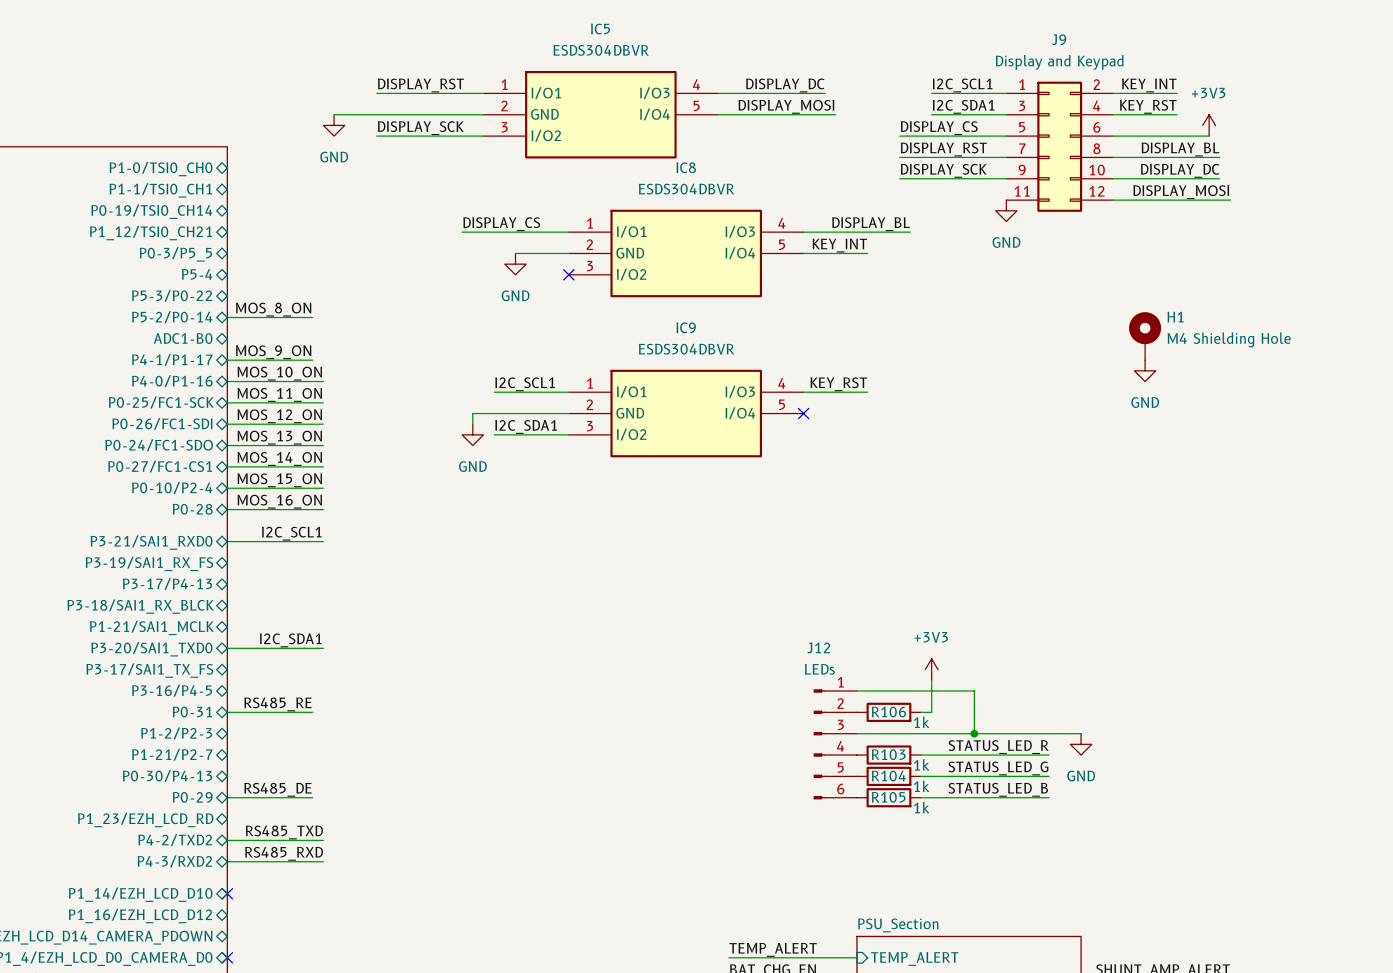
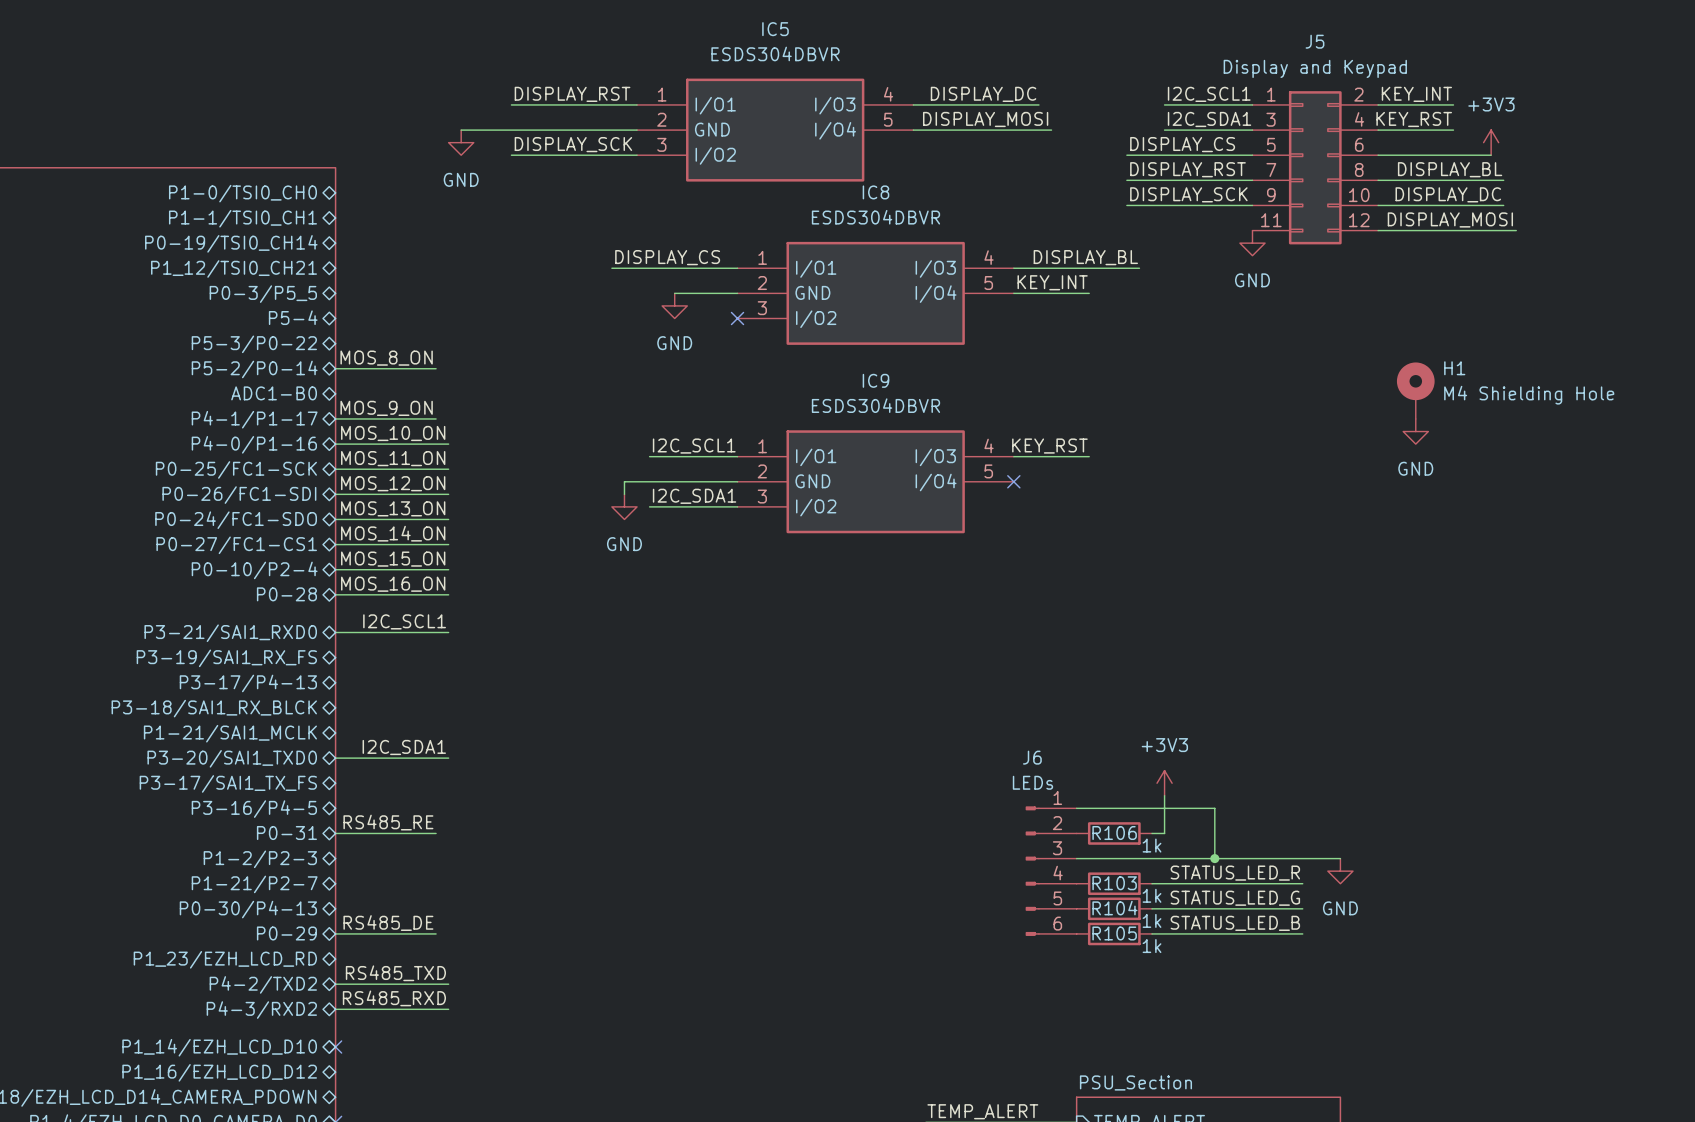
J9 name: J9 (1059, 39) -> J5 (1314, 41)
J12 name: J12 (818, 647) -> J6 (1032, 757)

